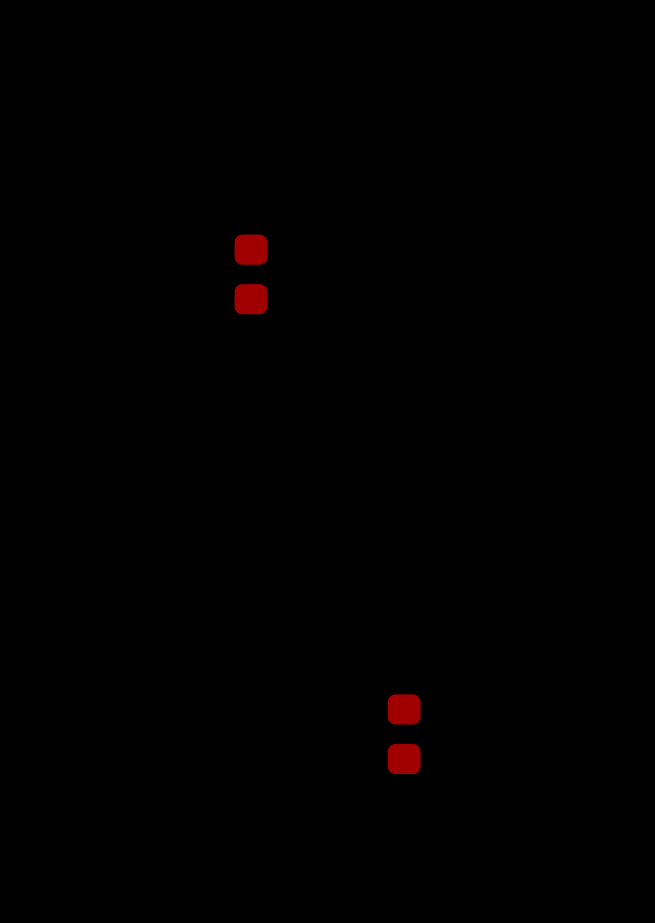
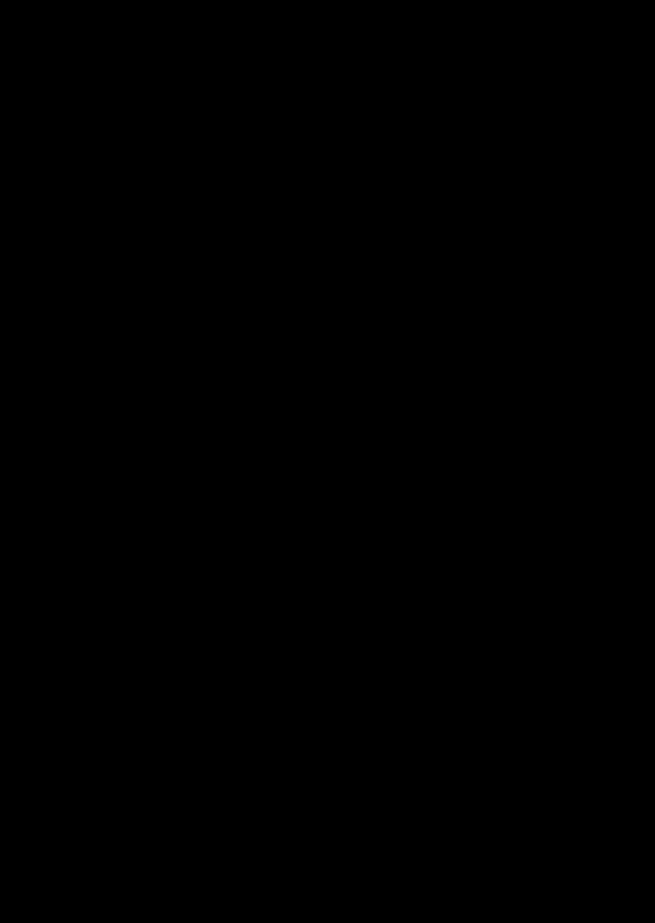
part: (250, 274) -> none
part: (404, 734) -> none

